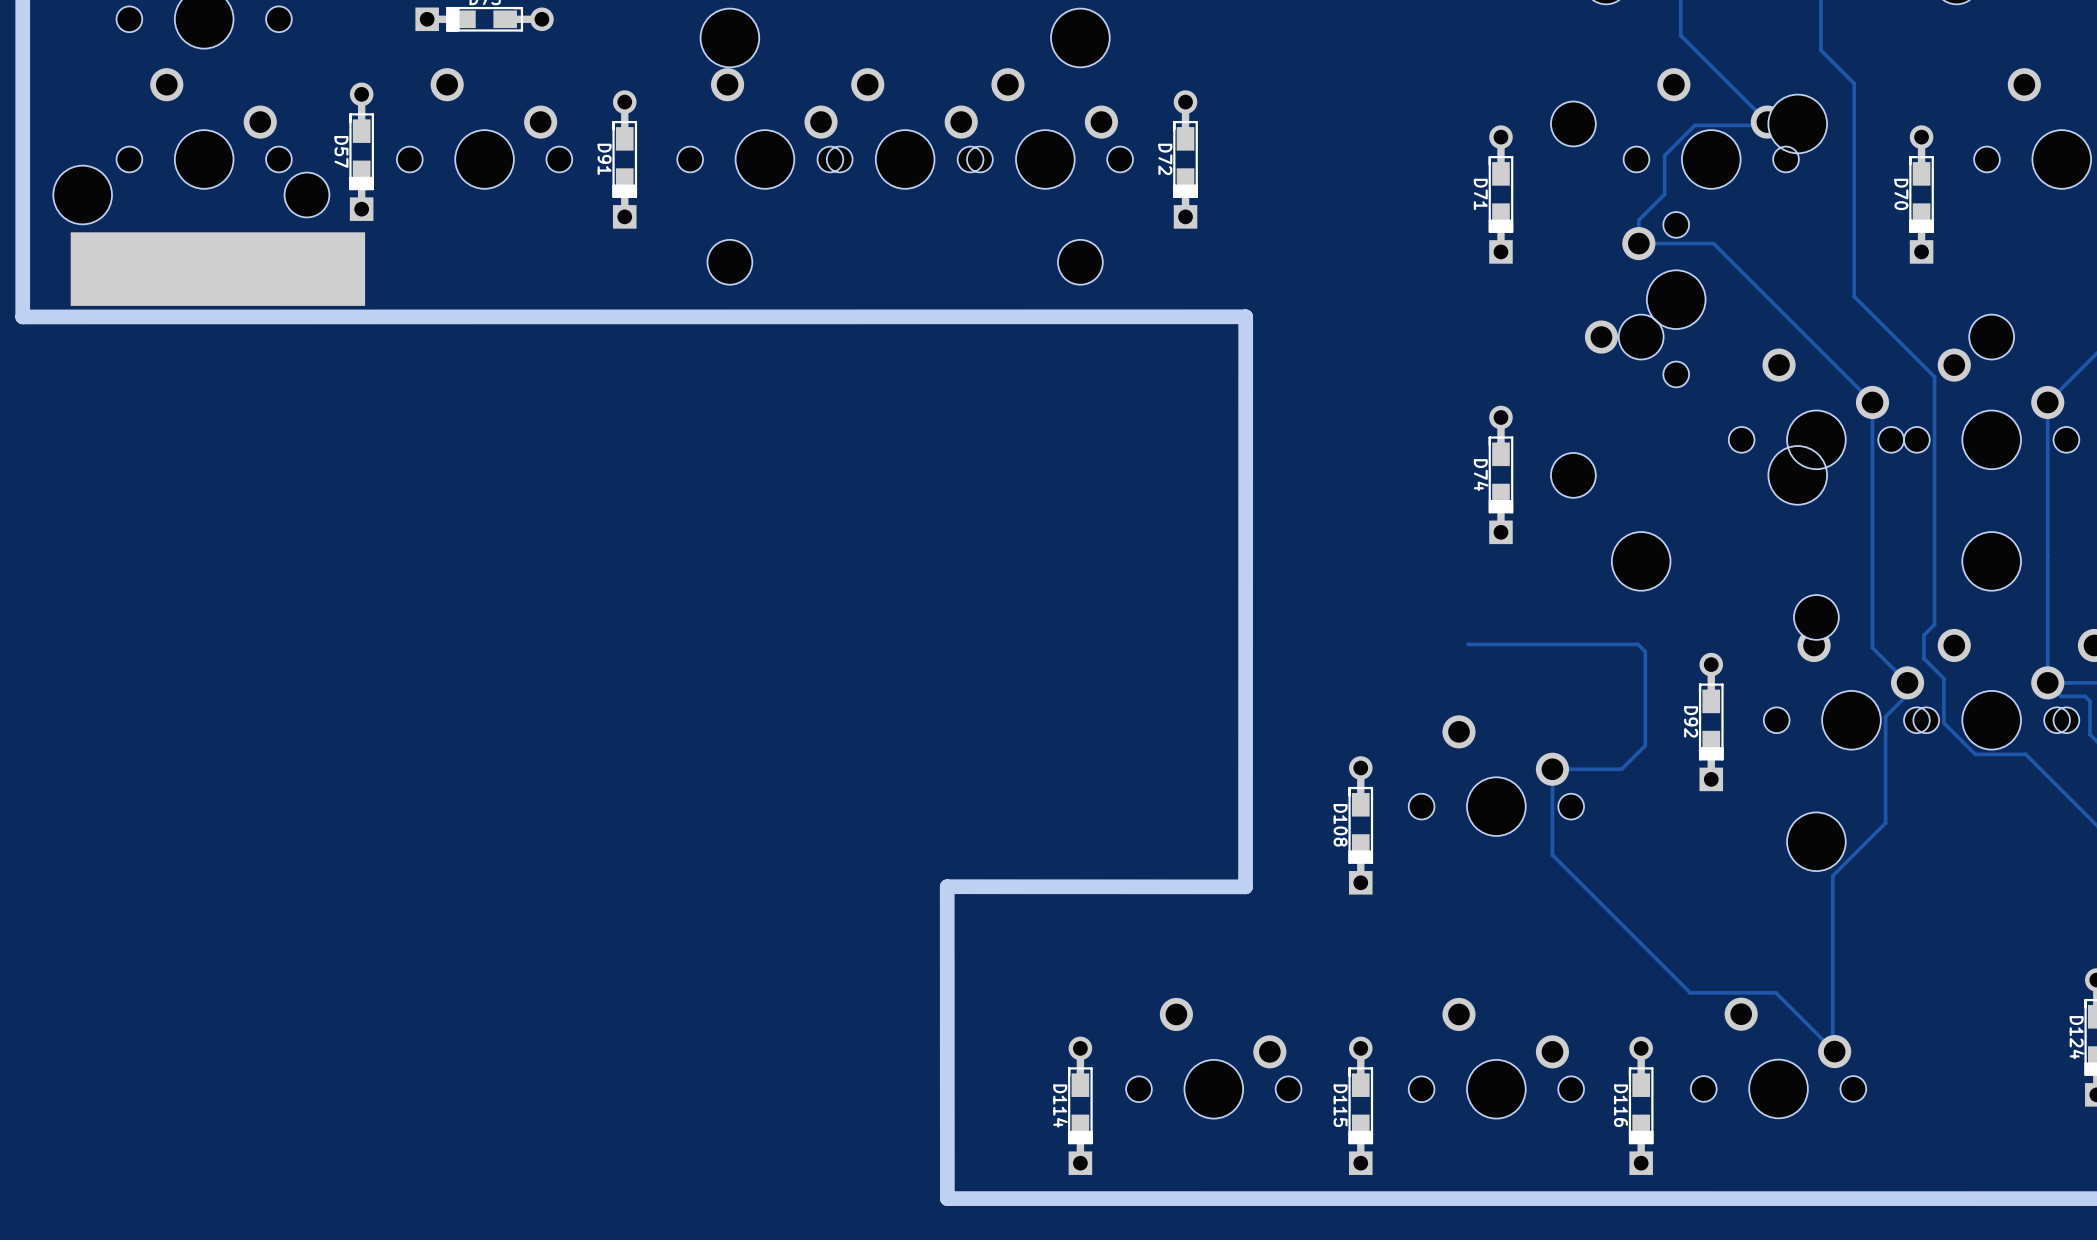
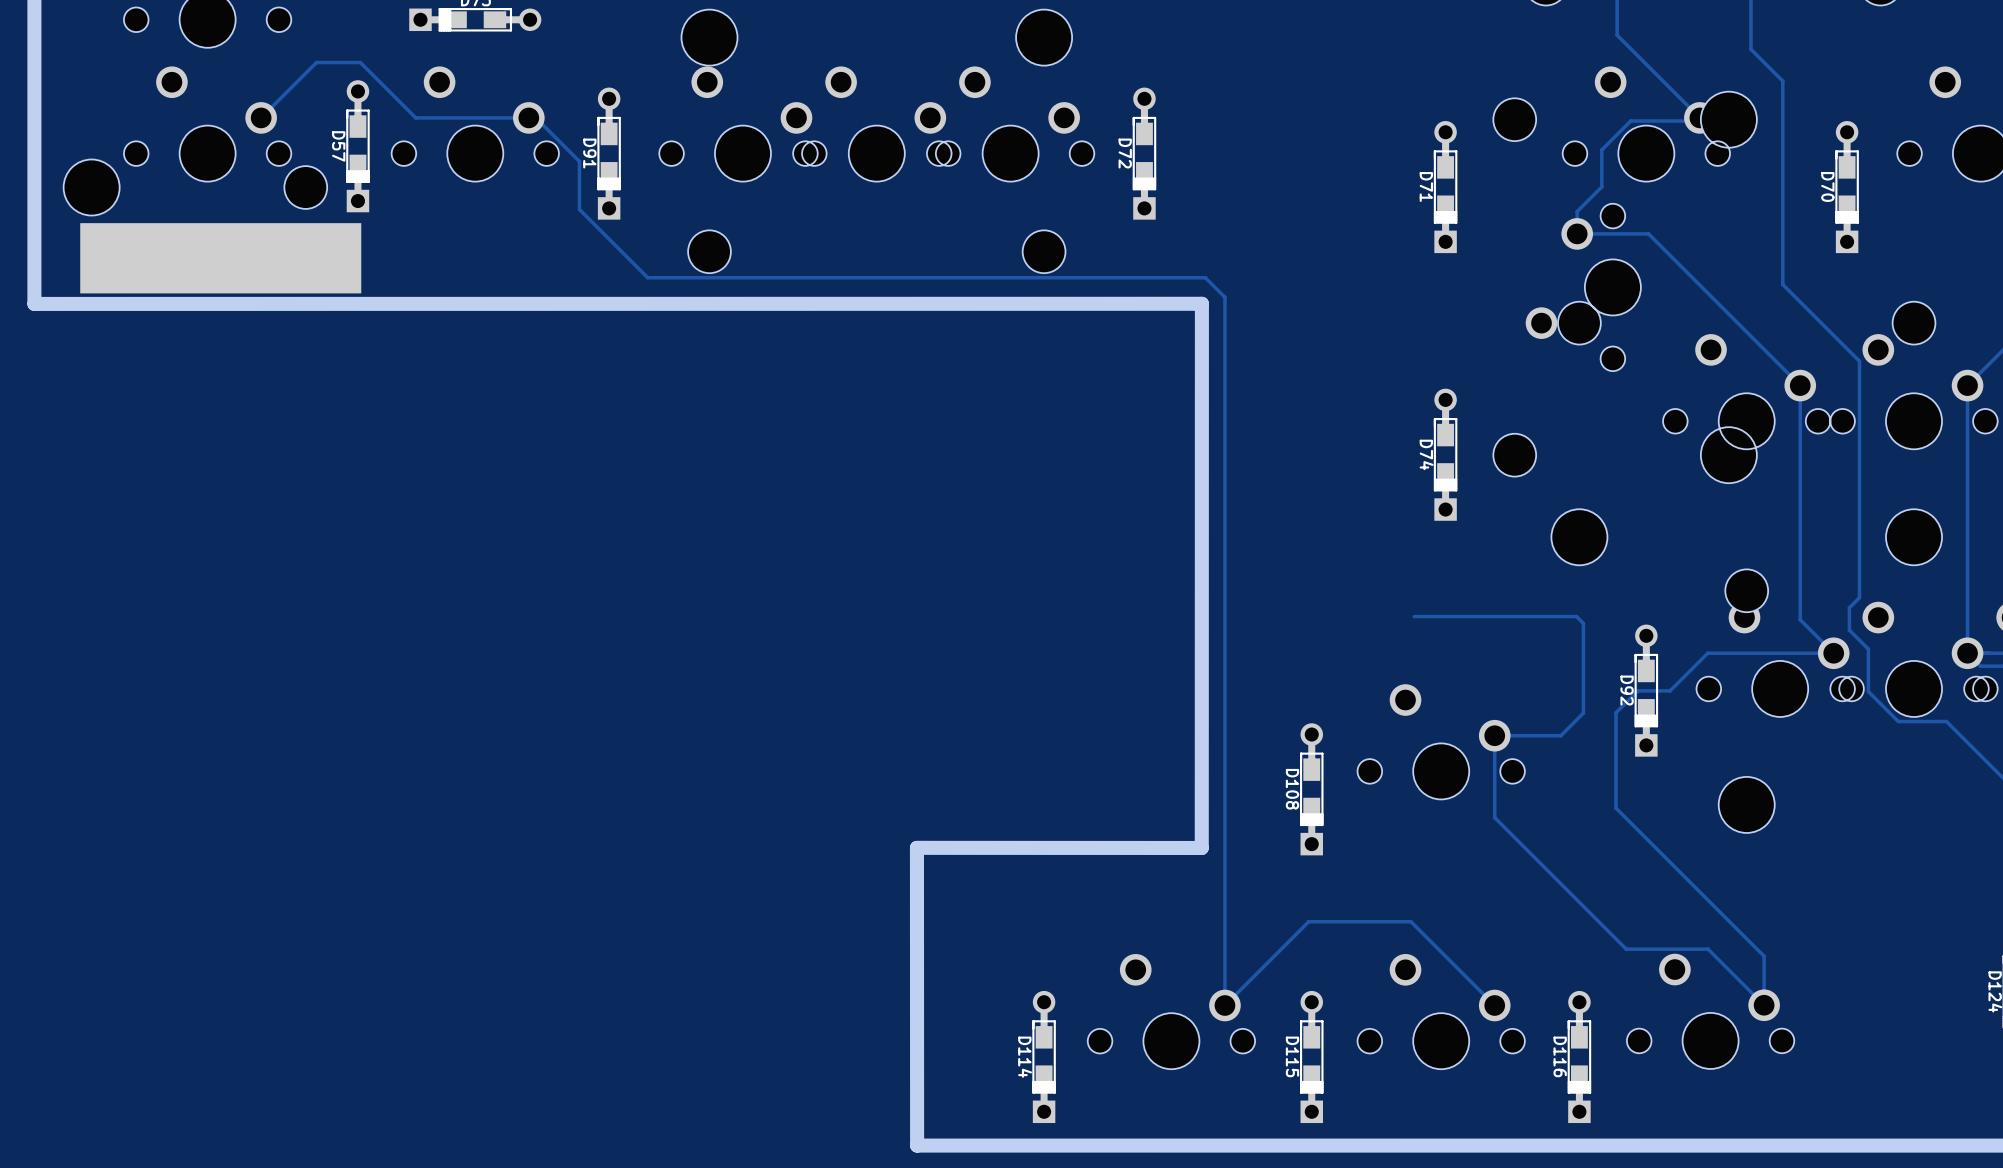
track: none -> (261, 117) (316, 62) (360, 62) (415, 117) (535, 117) (579, 161) (579, 209) (647, 277) (1205, 277) (1224, 297) (1224, 1005) (1308, 921) (1410, 921) (1494, 1005)
track: none -> (1833, 653) (1707, 653) (1670, 690) (1637, 690) (1615, 712) (1615, 808) (1764, 956) (1764, 1005)
track: (1907, 694) (1885, 716) (1885, 823) (1832, 875) (1832, 1049) -> none

